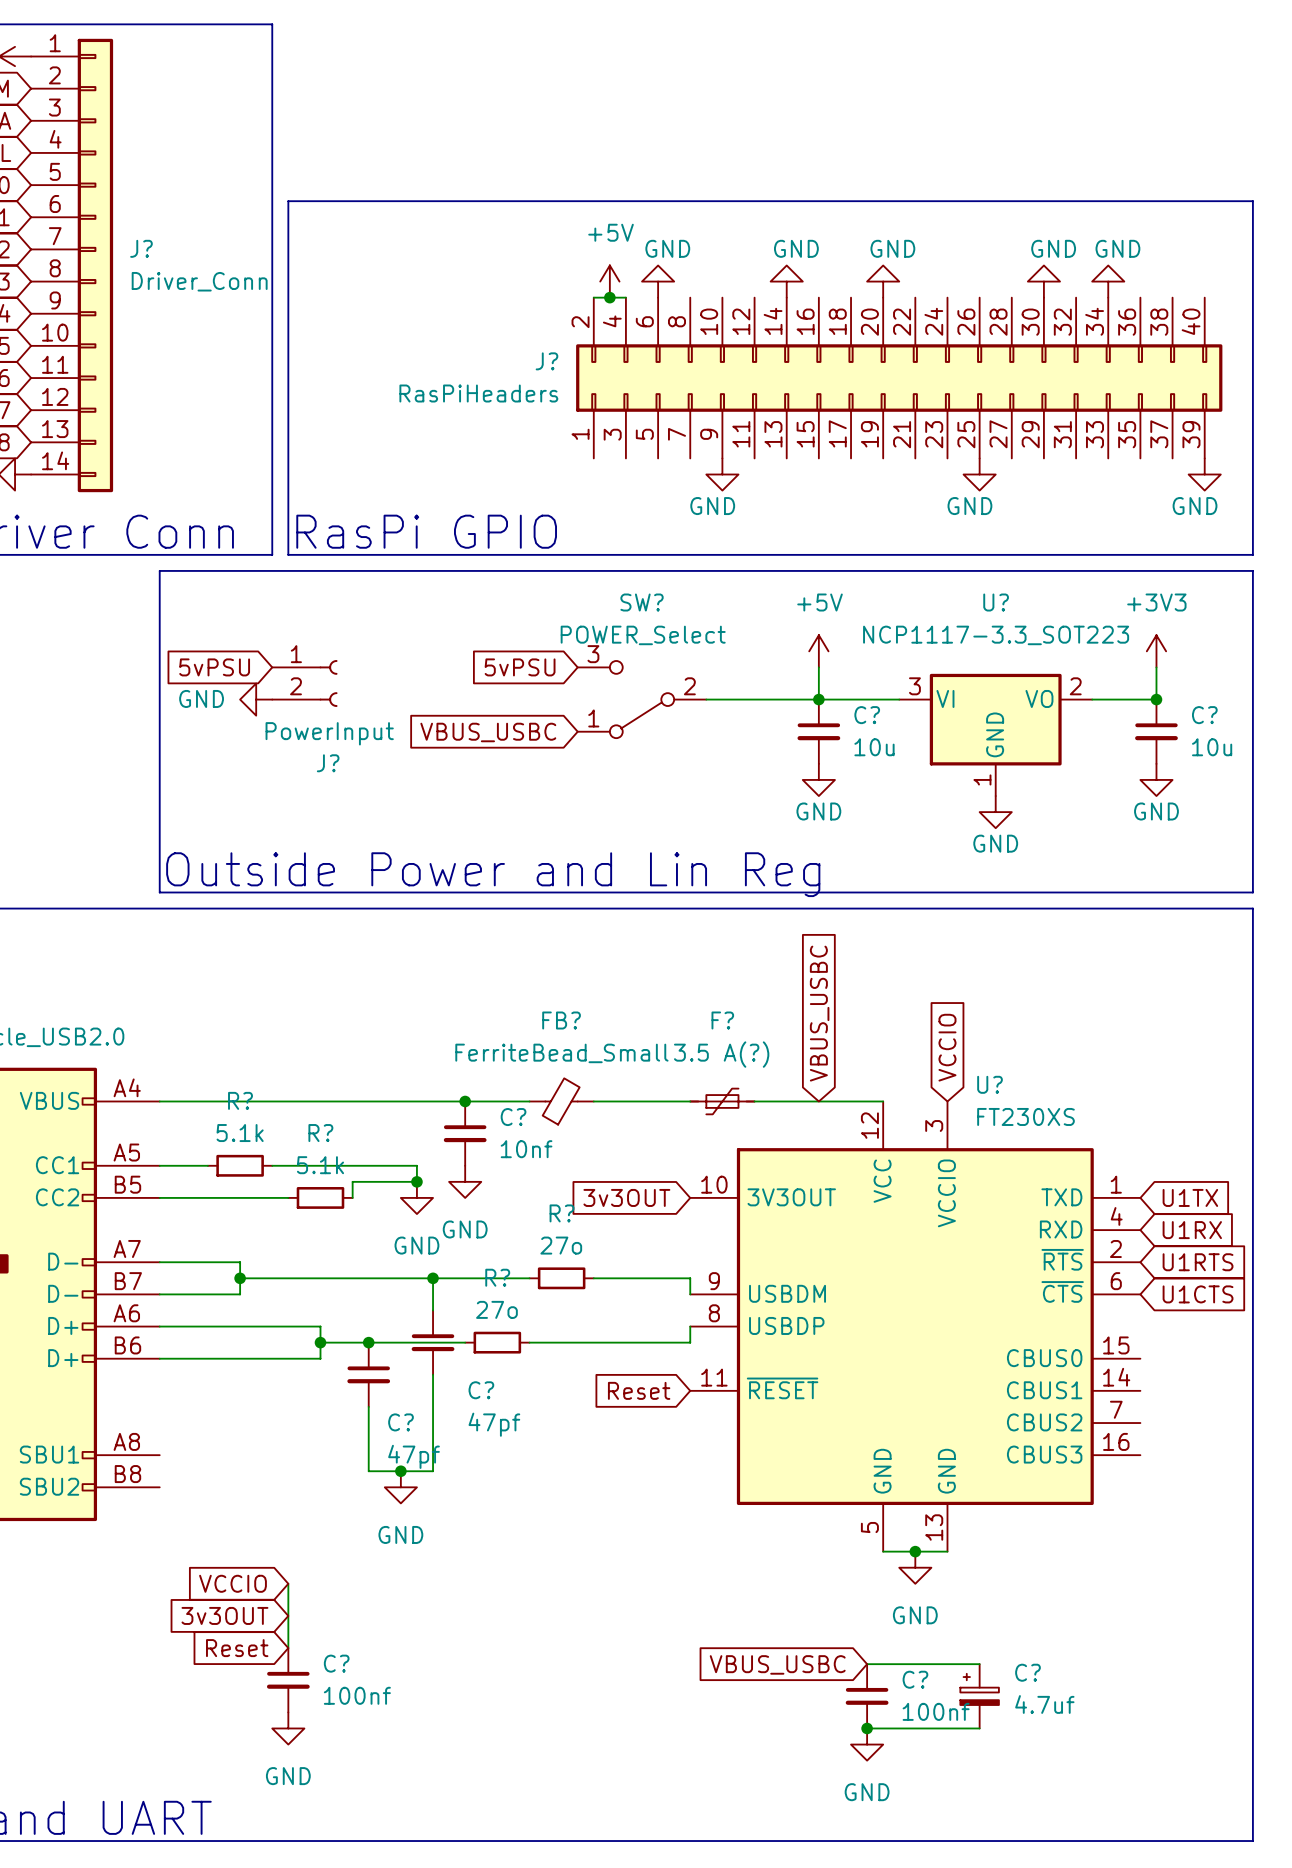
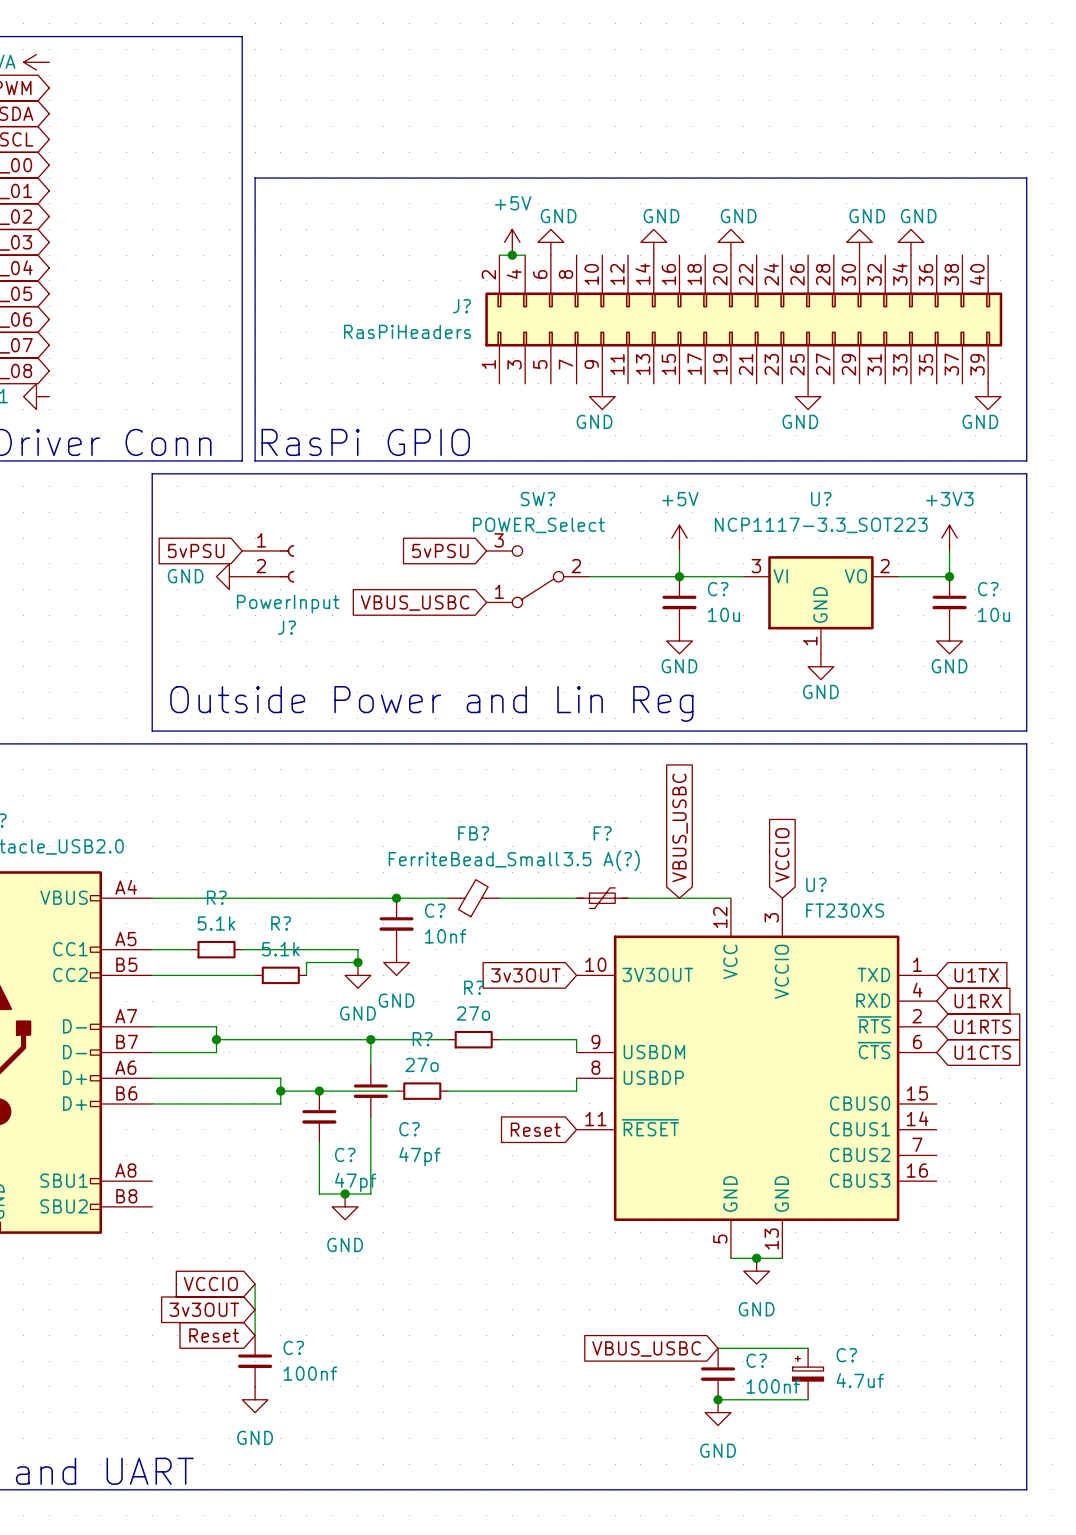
J?: Driver_Conn (72, 265) -> none
text position: Outside Power and Lin Reg (493, 874) -> Outside Power and Lin Reg (431, 703)

